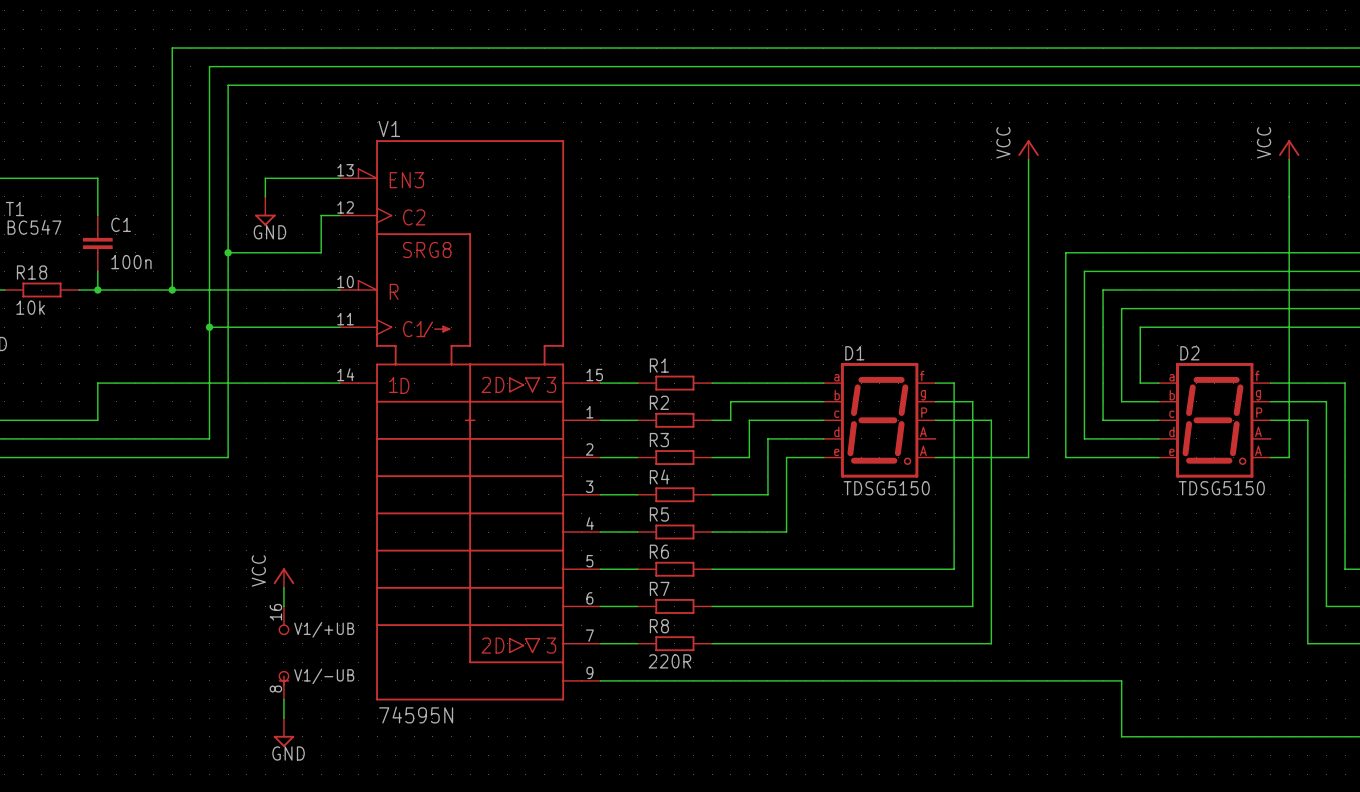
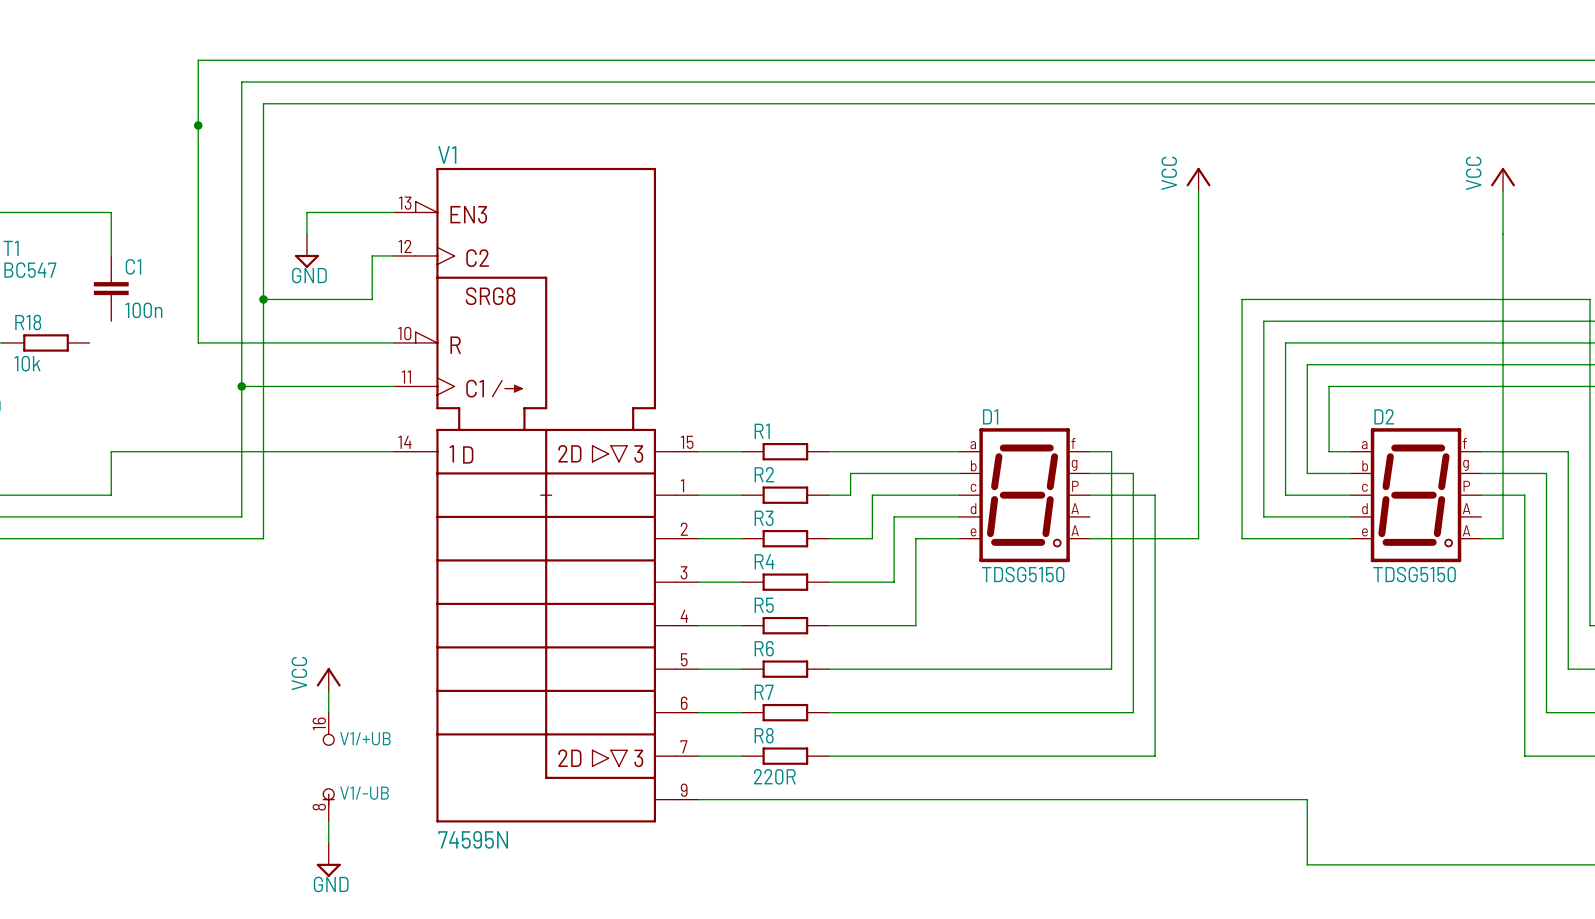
junction: none -> (198, 125)
wire: (97, 271) (97, 290) -> none
wire: (79, 290) (172, 290) -> none
junction: (97, 290) -> none
junction: (172, 290) -> none

